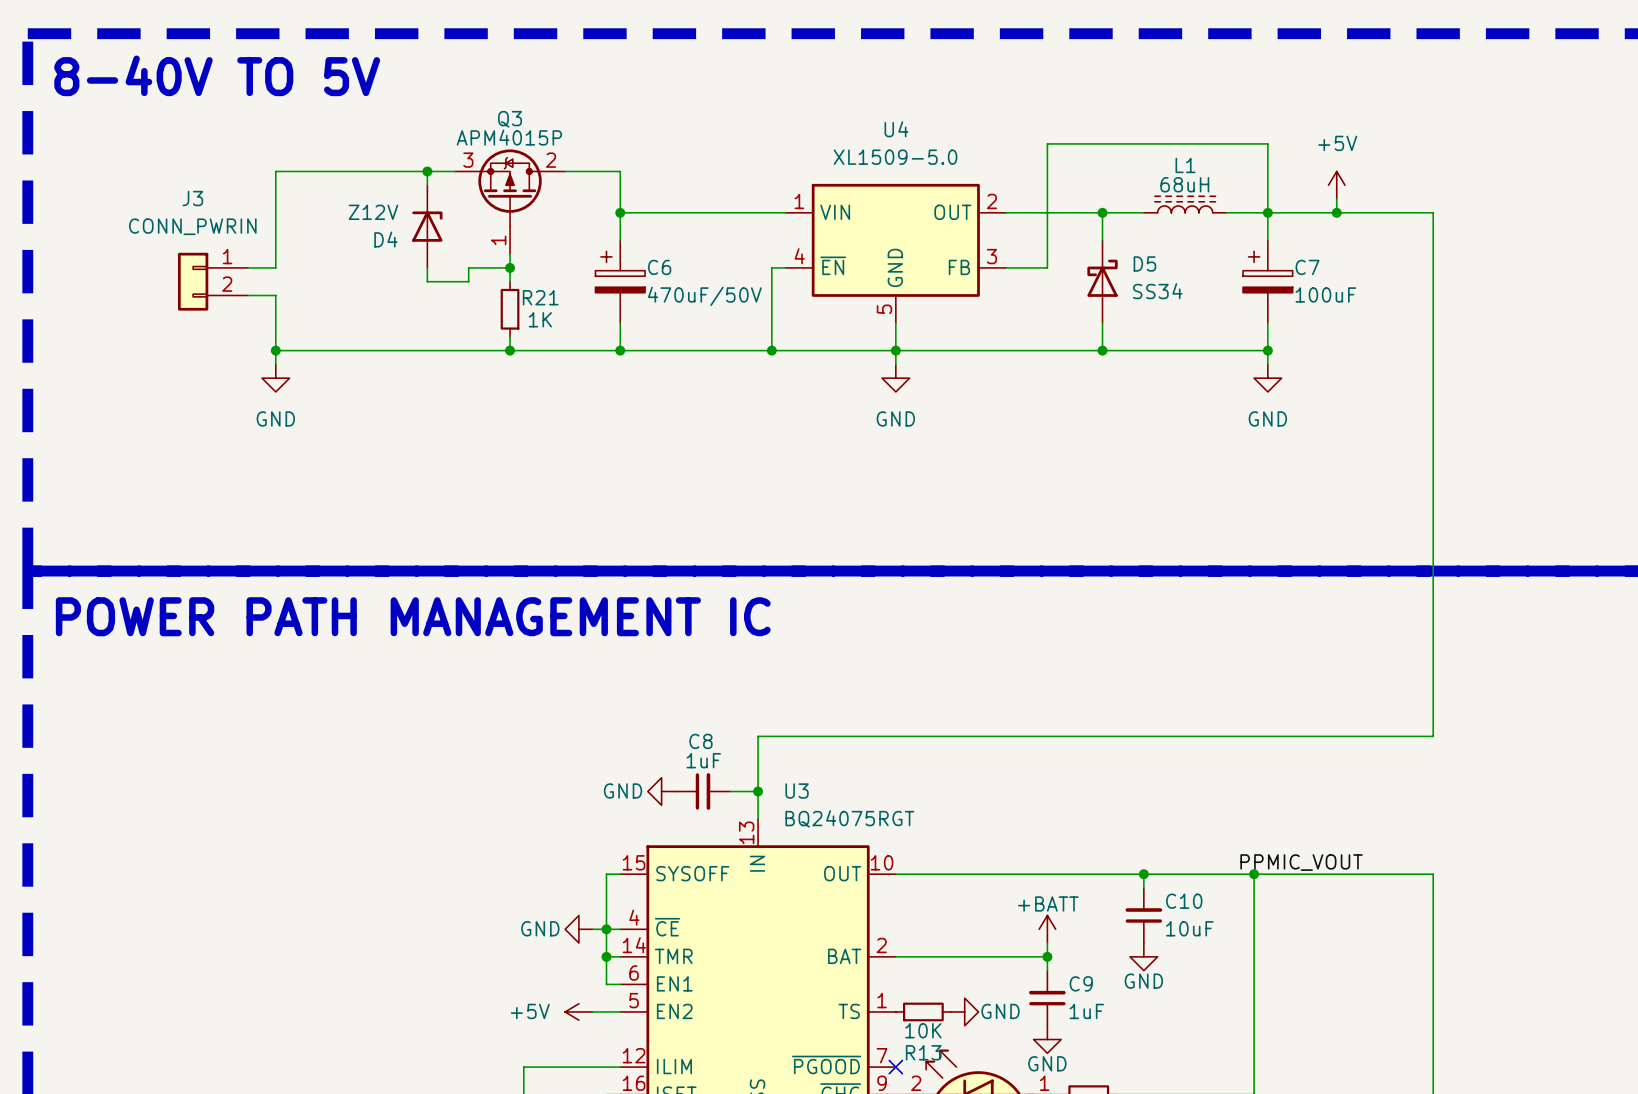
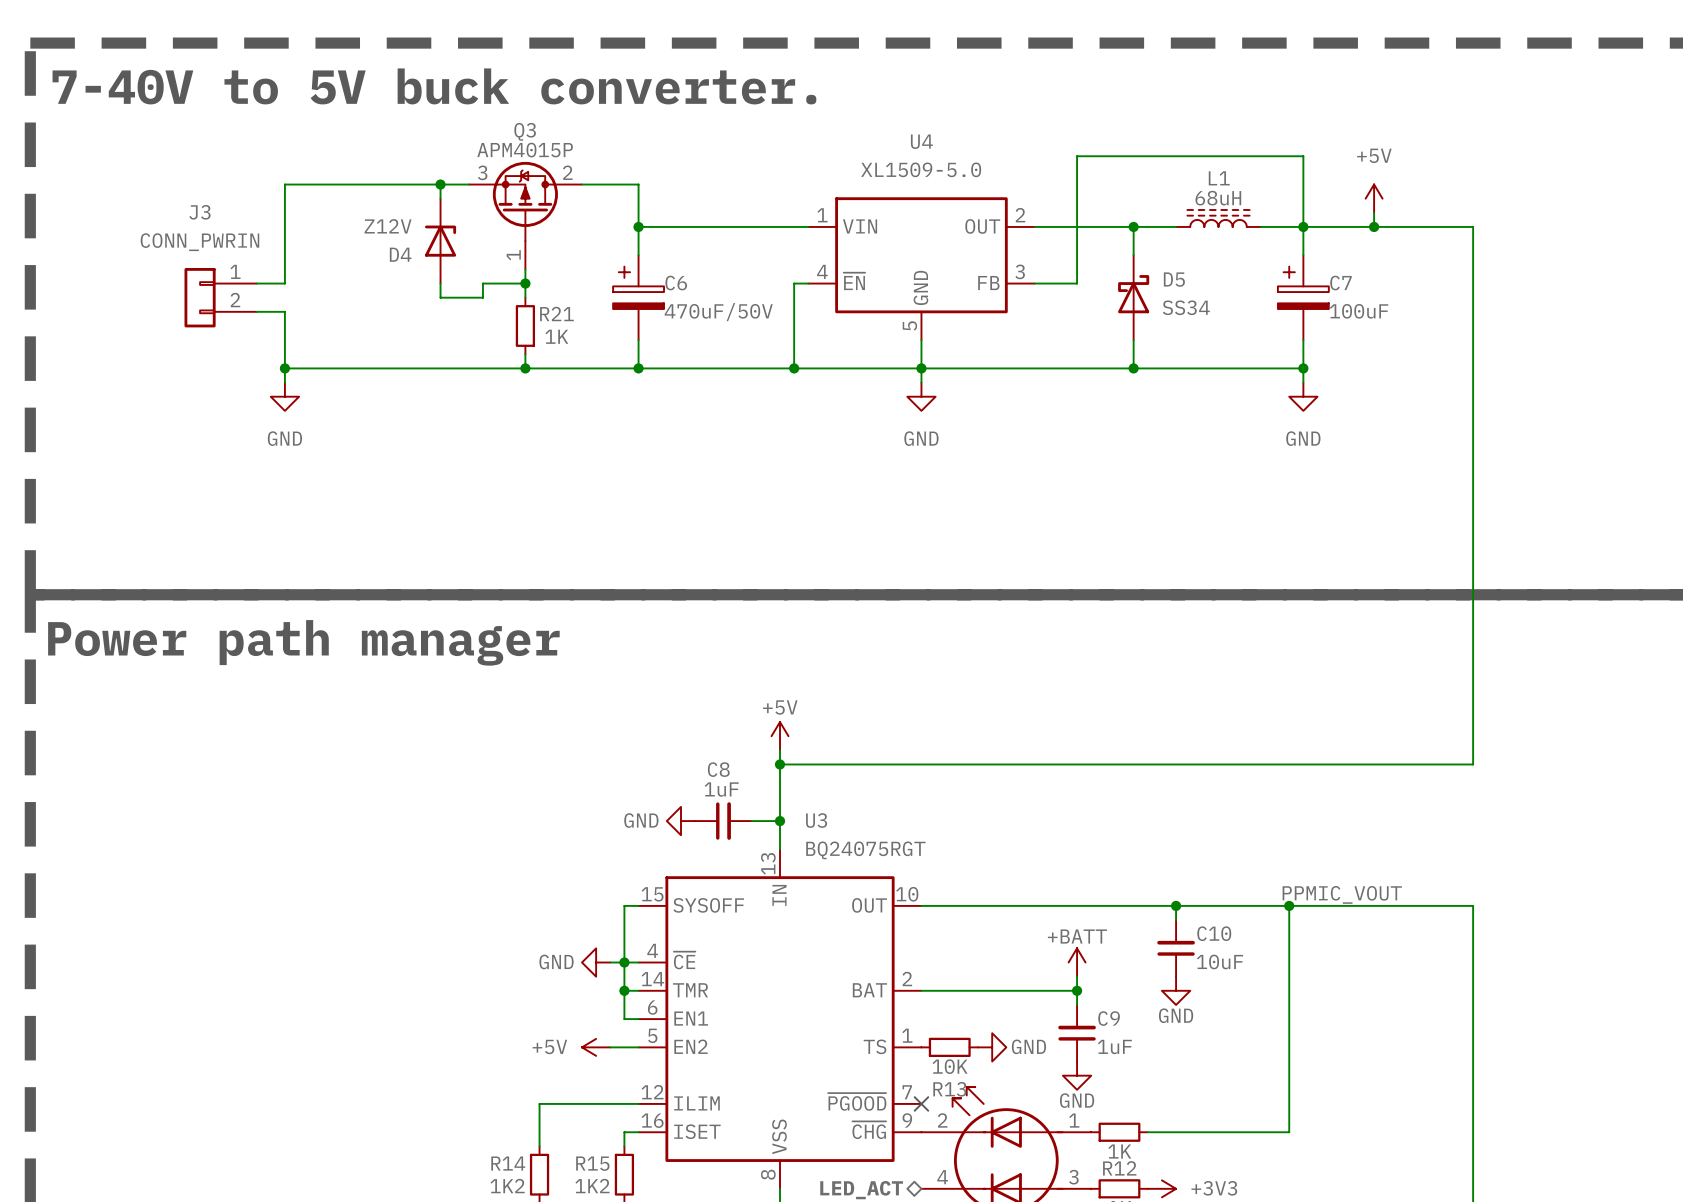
text: 8-40V TO 5V (217, 75) -> 7-40V to 5V buck converter. (434, 86)
text: POWER PATH MANAGEMENT IC (413, 616) -> Power path manager (303, 642)
power symbol: none -> +5V (780, 736)
wire: none -> (780, 750) (780, 764)
junction: none -> (780, 764)

